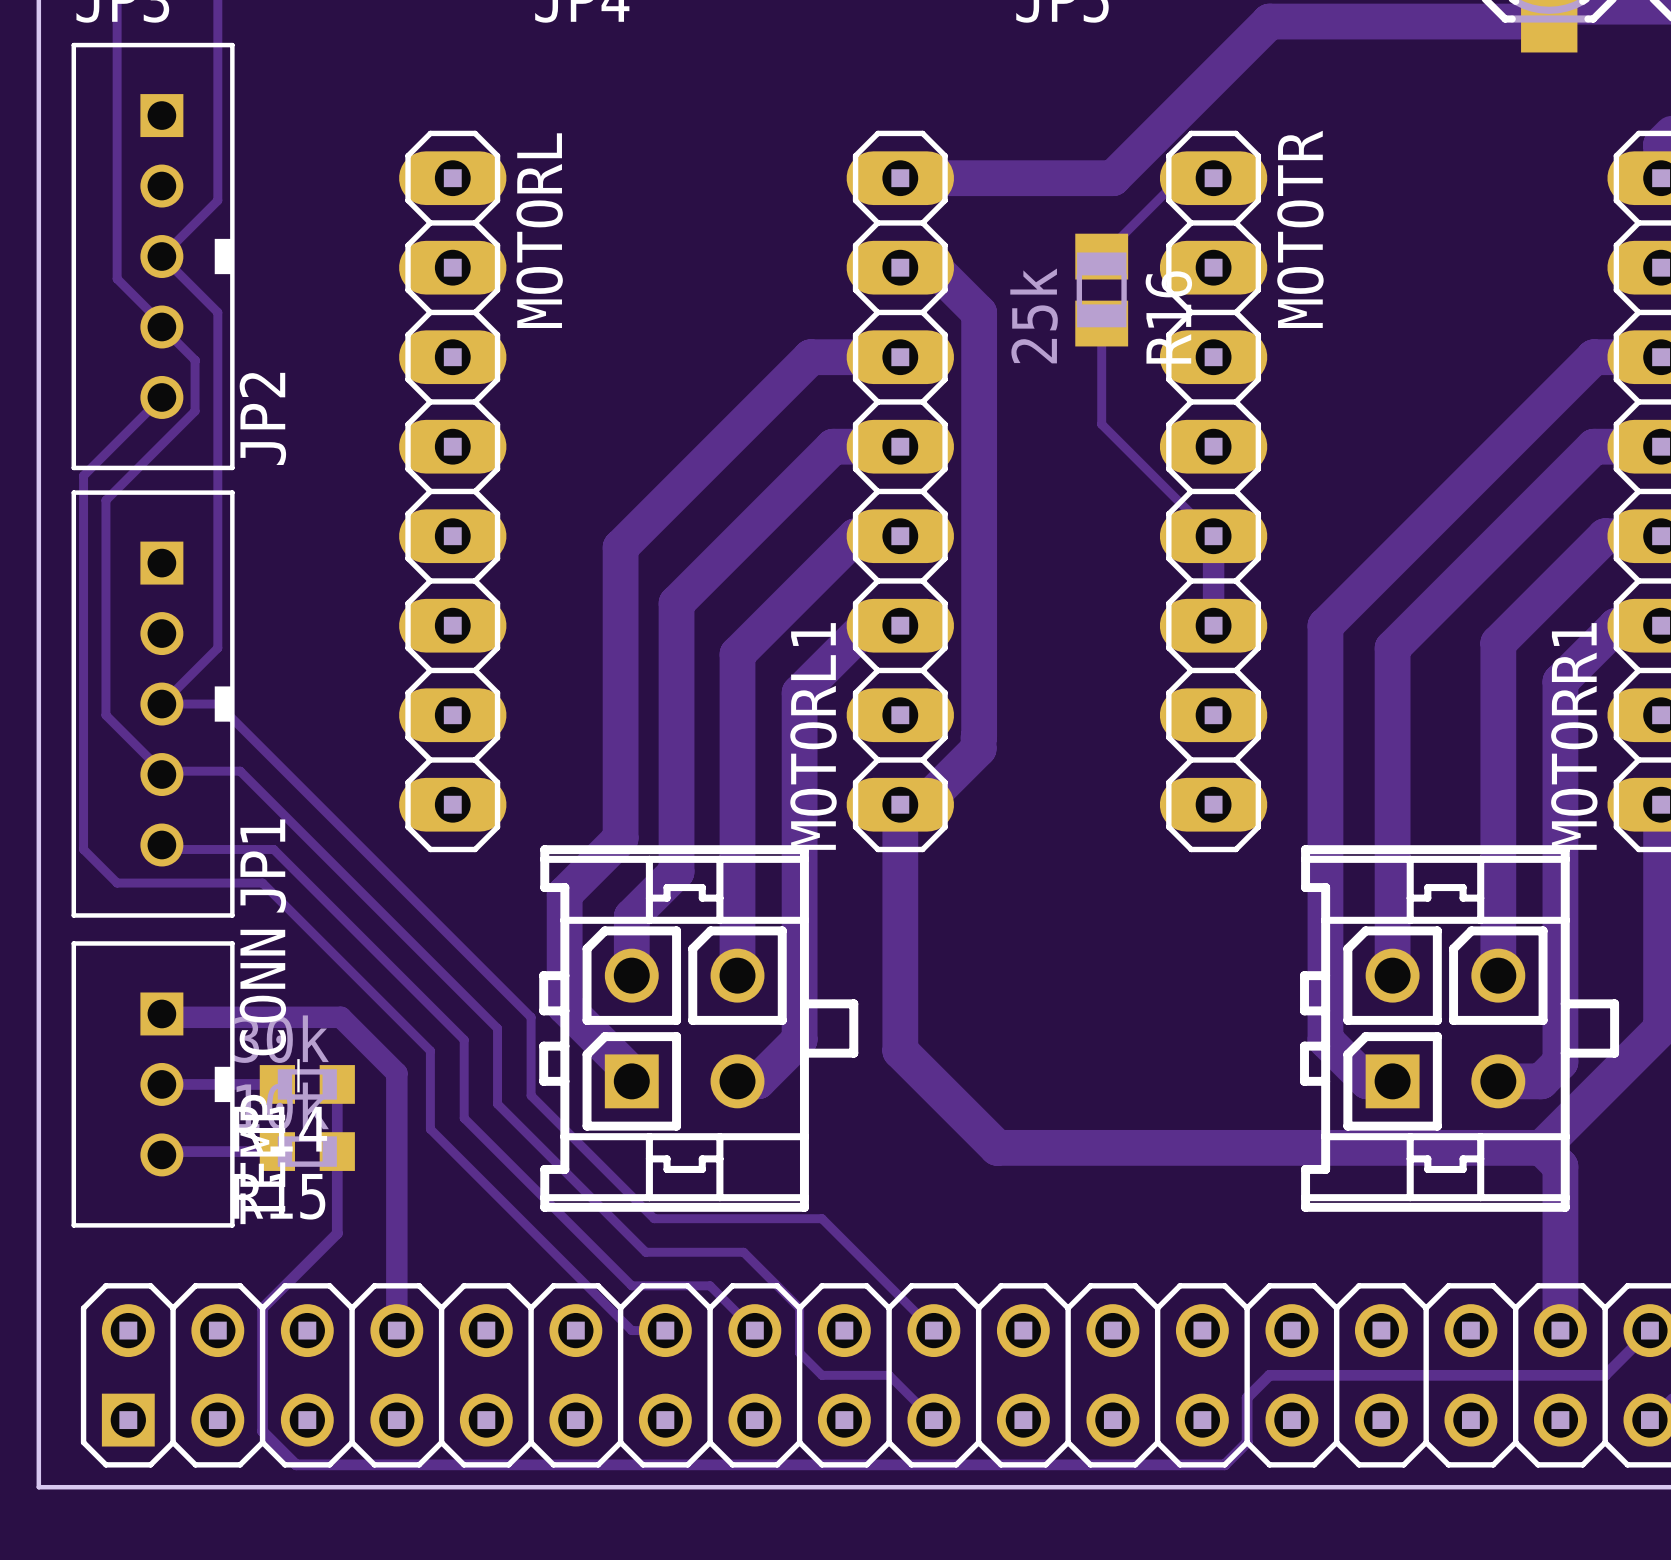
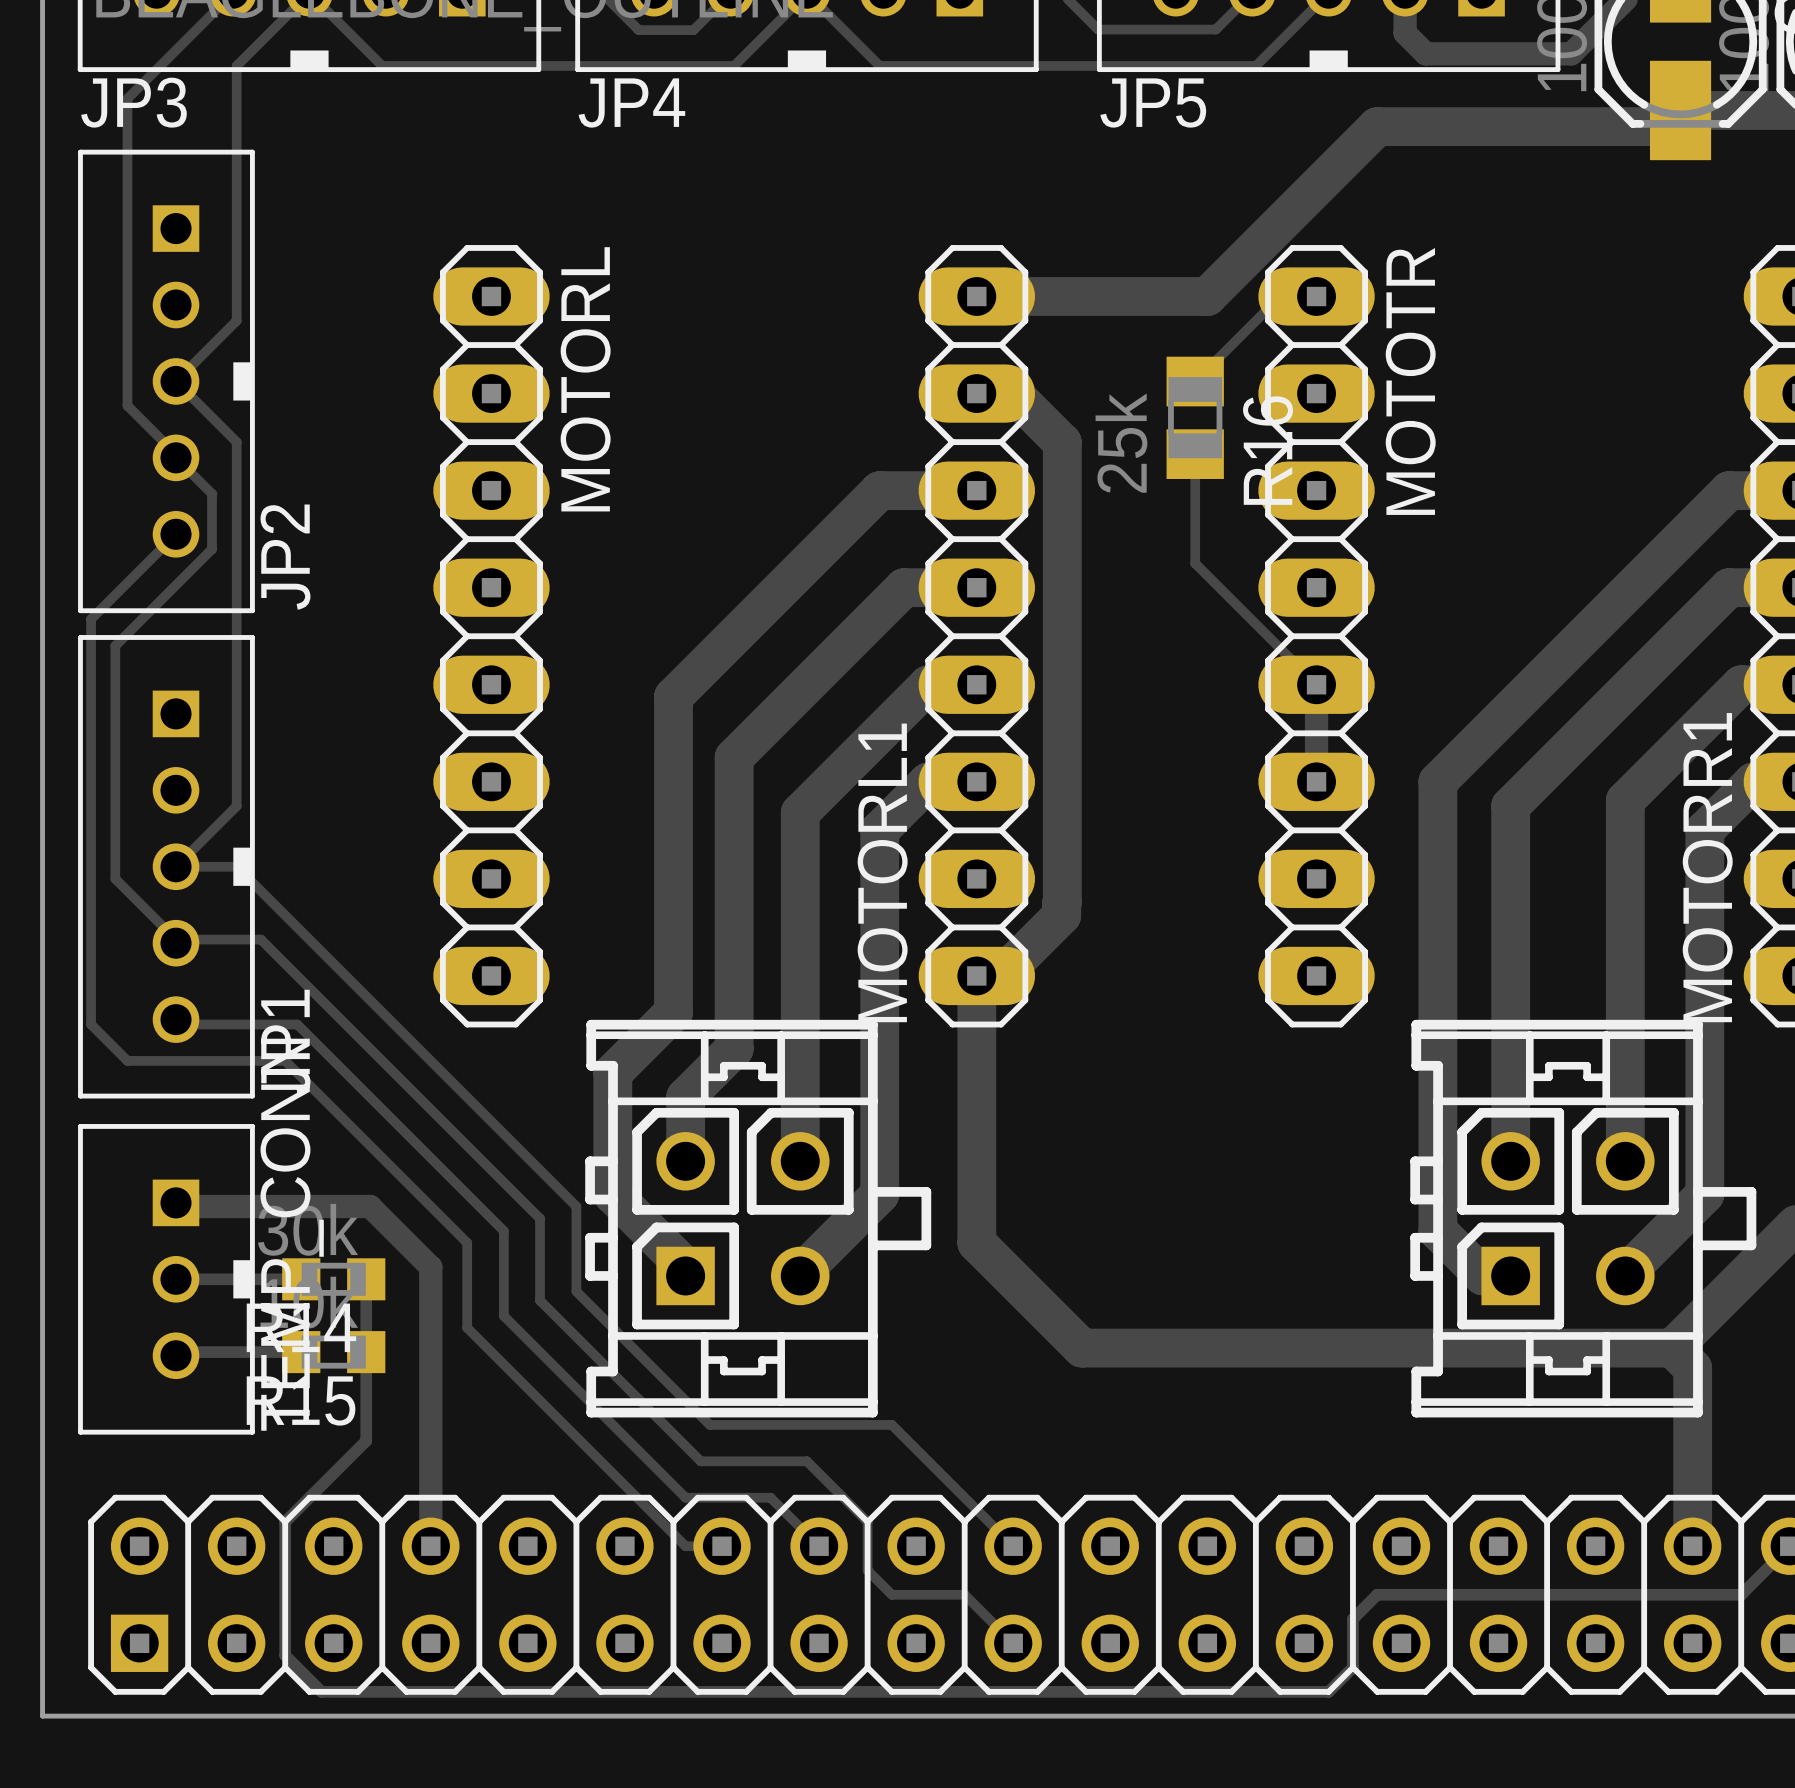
track: (866, 625) (799, 692) (799, 1039) (757, 1081) (737, 1081) -> (940, 781) (928, 781) (879, 830) (879, 1194) (800, 1275)
track: (1571, 670) (1560, 681) (1560, 1062) (1541, 1081) (1498, 1081) -> (1704, 830) (1704, 1194) (1625, 1275)

